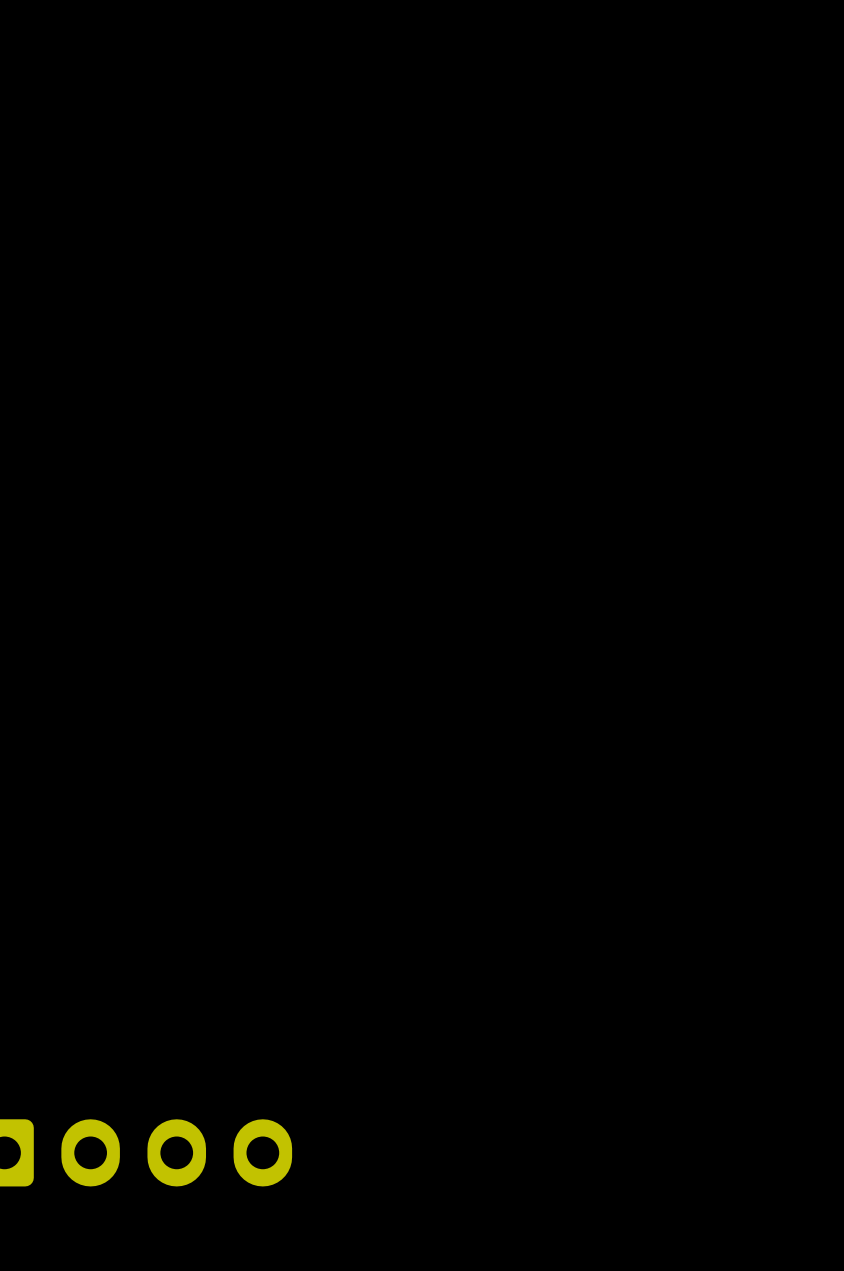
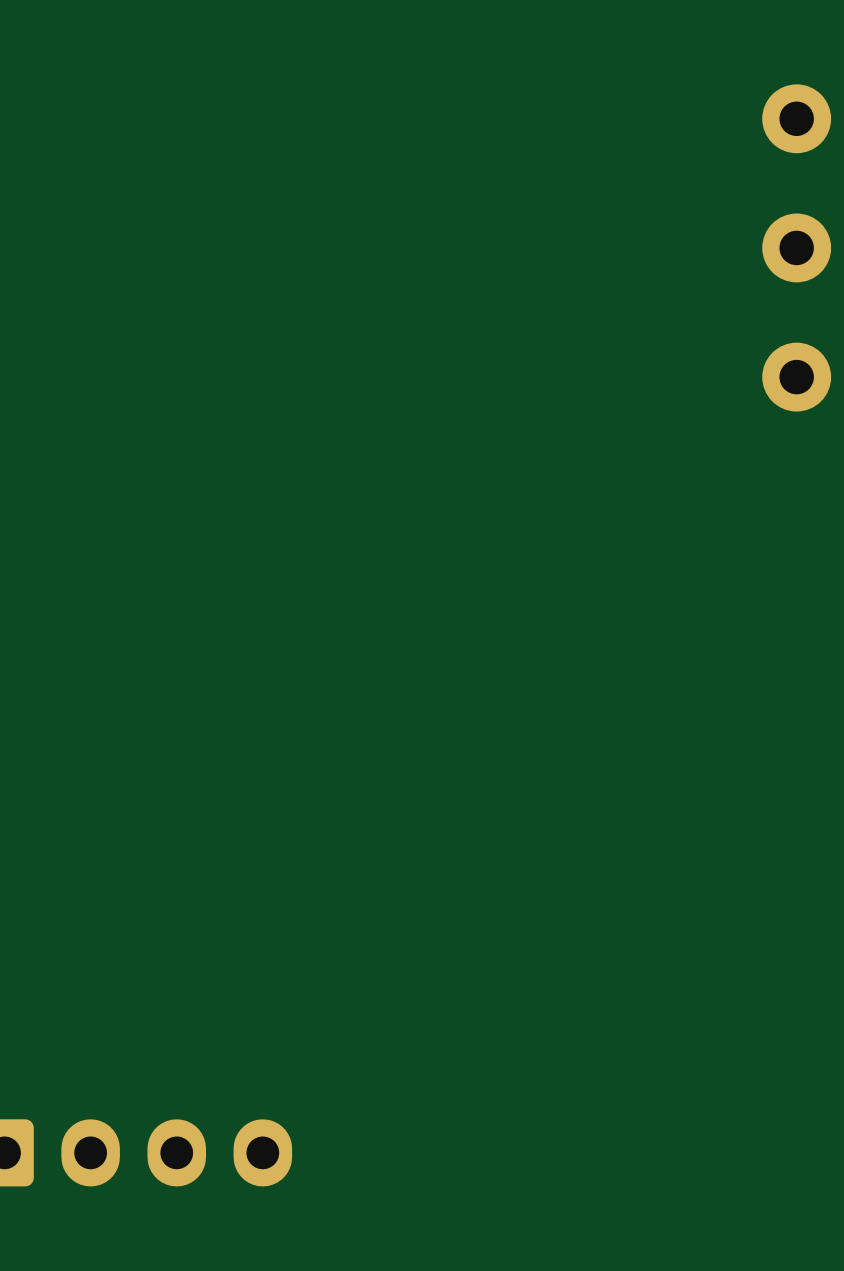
part: none -> (796, 118)
part: none -> (796, 247)
part: none -> (796, 377)

